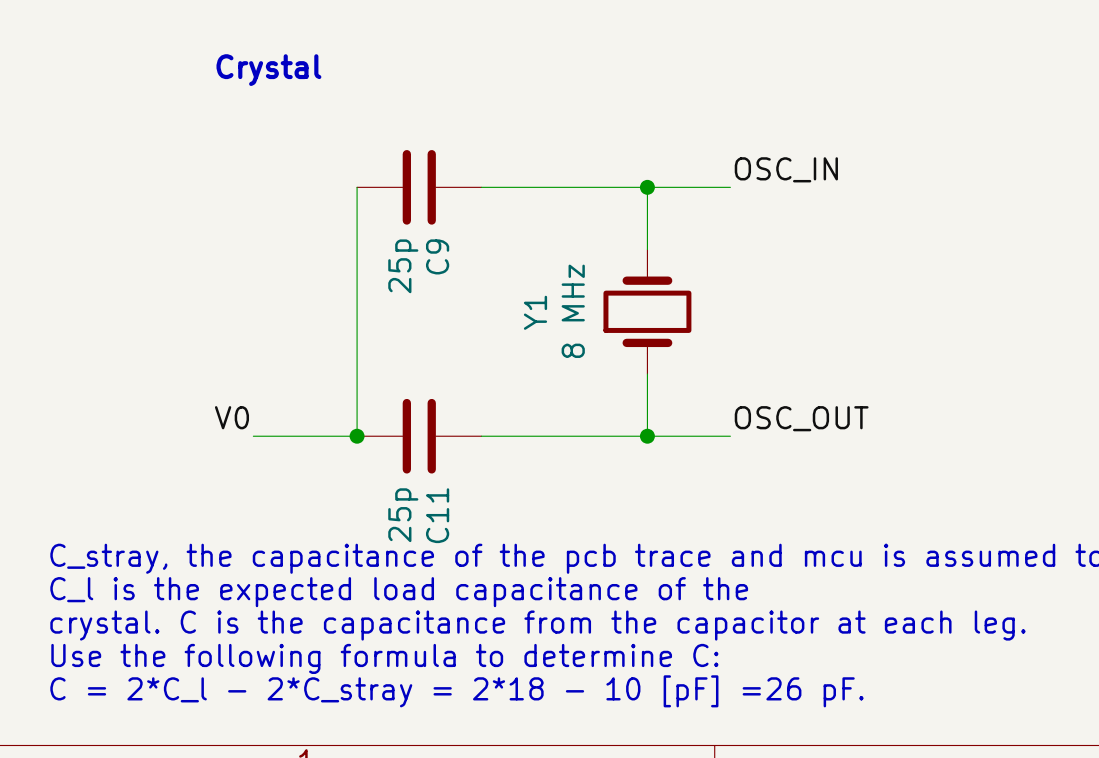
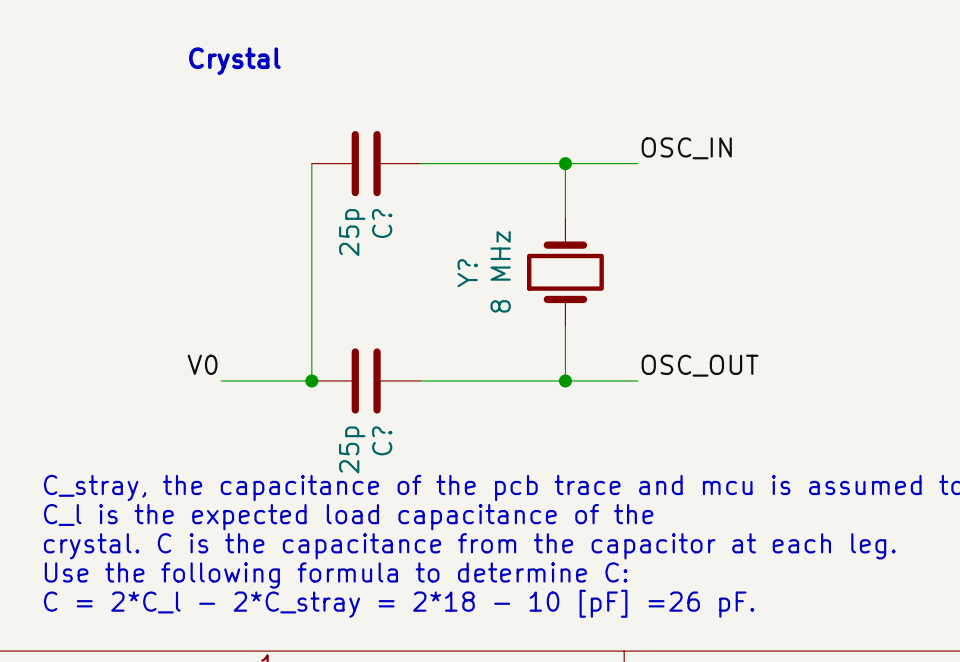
C9 name: C9 (437, 256) -> C? (382, 223)
Y1 name: Y1 (535, 312) -> Y? (467, 273)
C11 name: C11 (437, 515) -> C? (382, 440)

